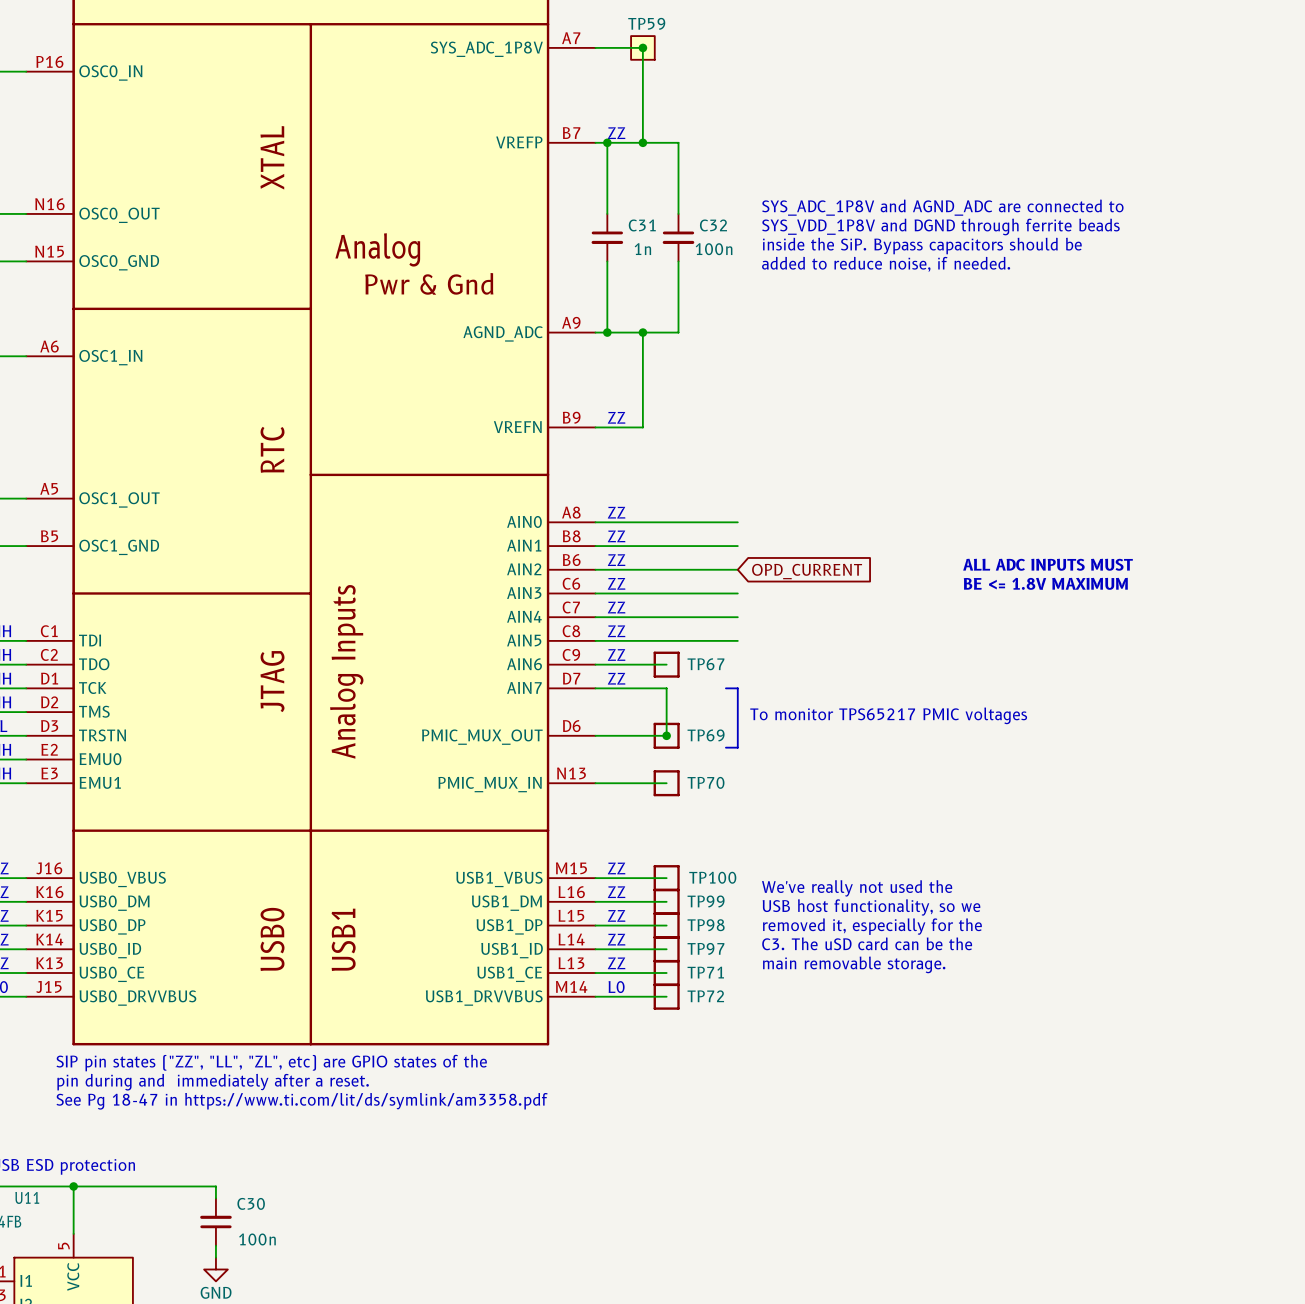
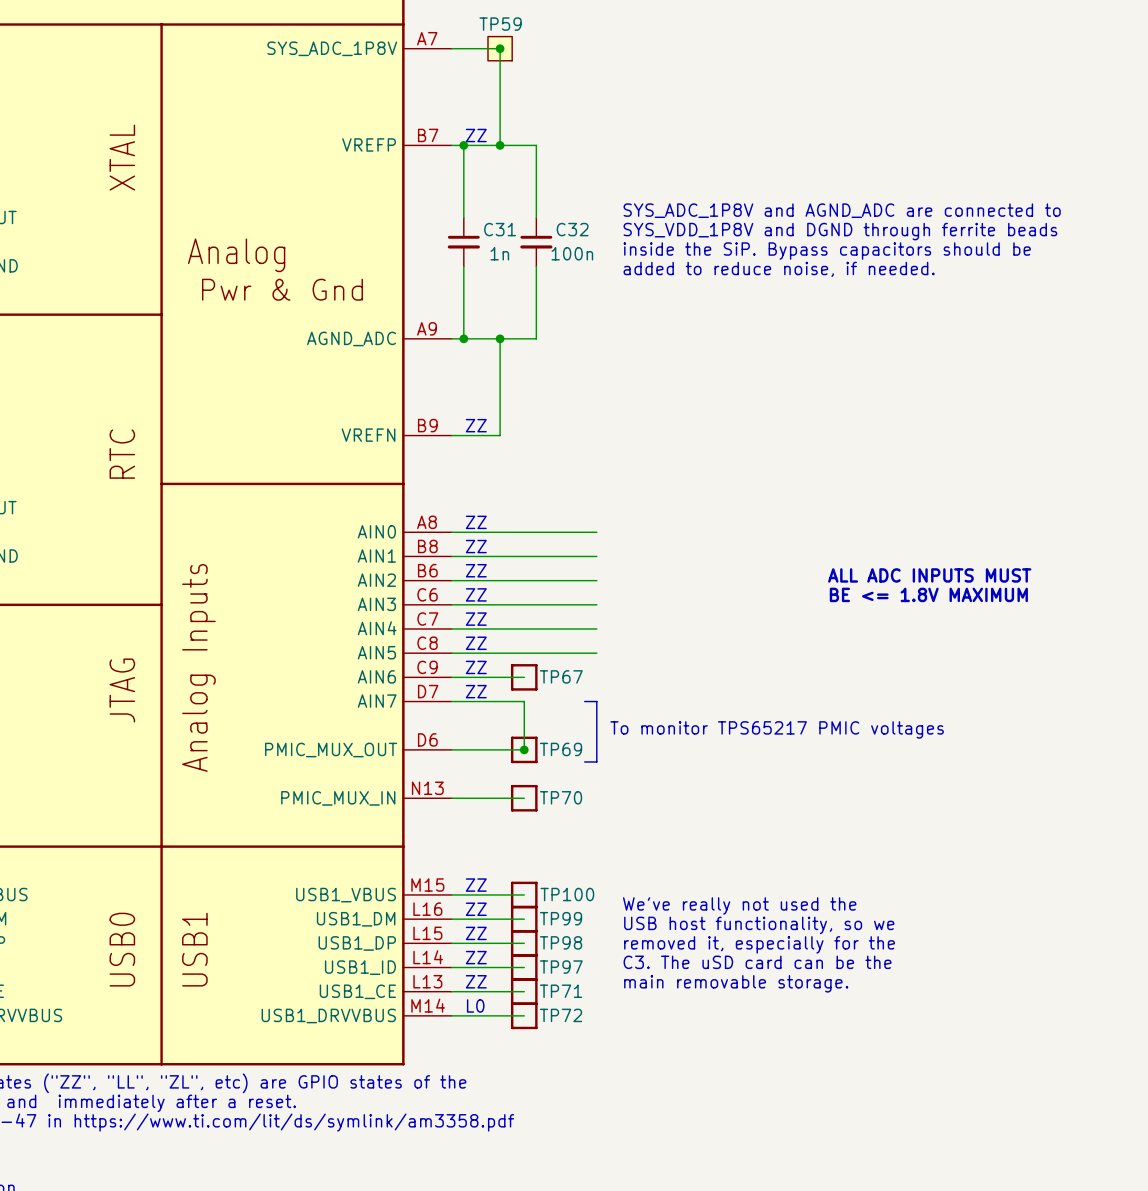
global label: OPD_CURRENT (807, 571) -> none

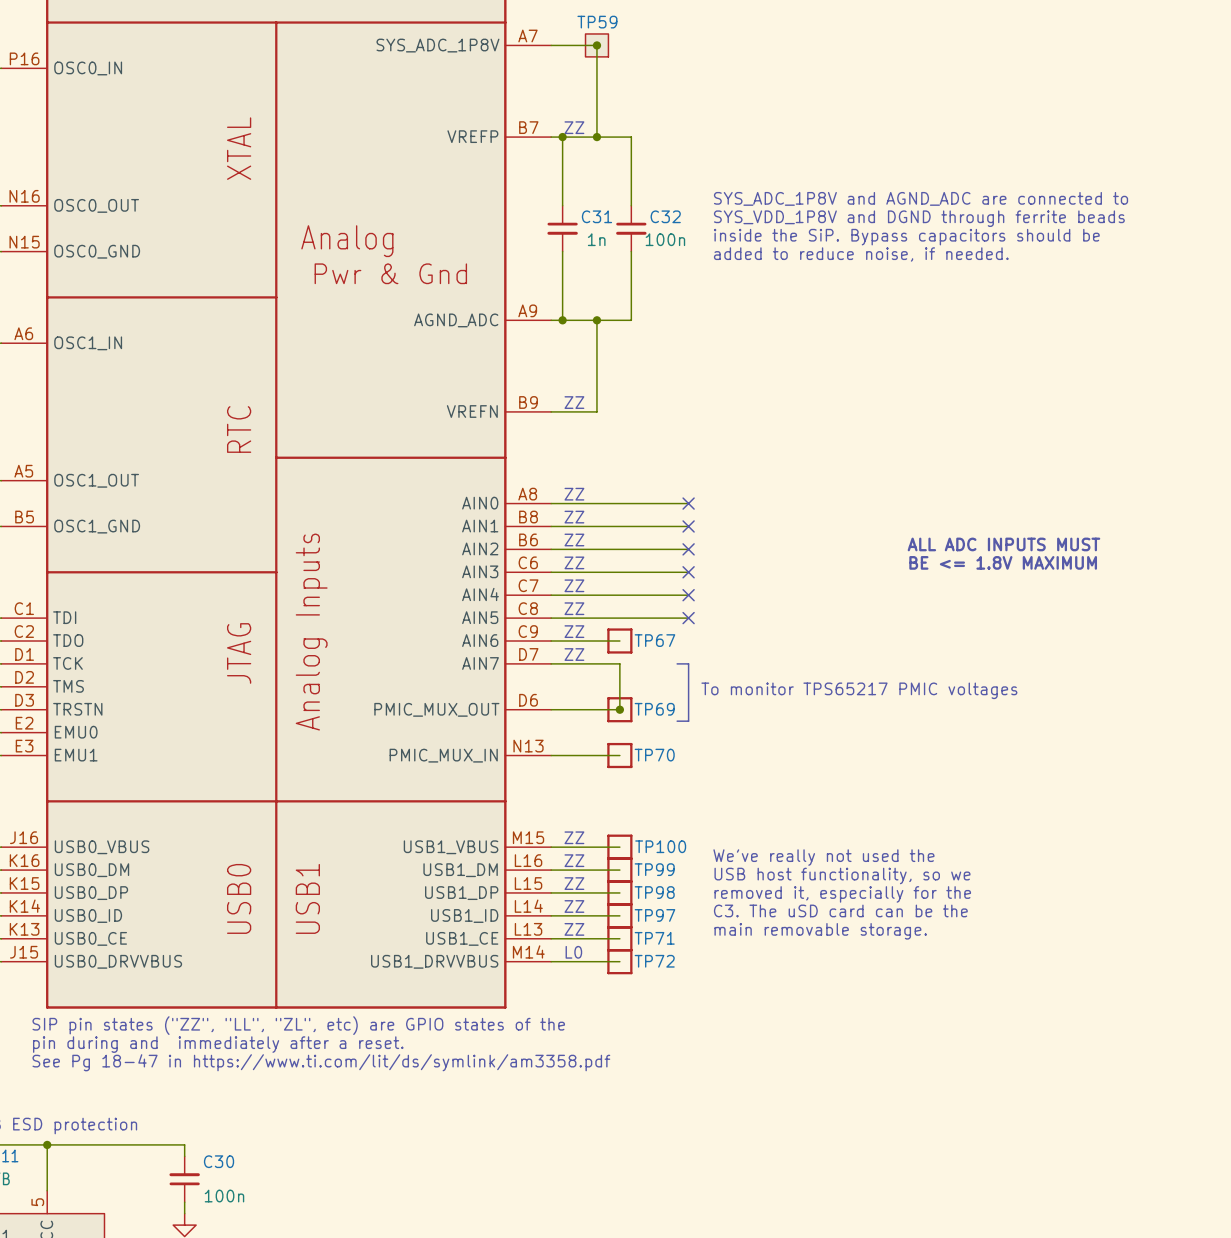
no-connect mark: none -> (688, 503)
no-connect mark: none -> (688, 526)
no-connect mark: none -> (688, 549)
no-connect mark: none -> (688, 572)
no-connect mark: none -> (688, 595)
no-connect mark: none -> (688, 618)

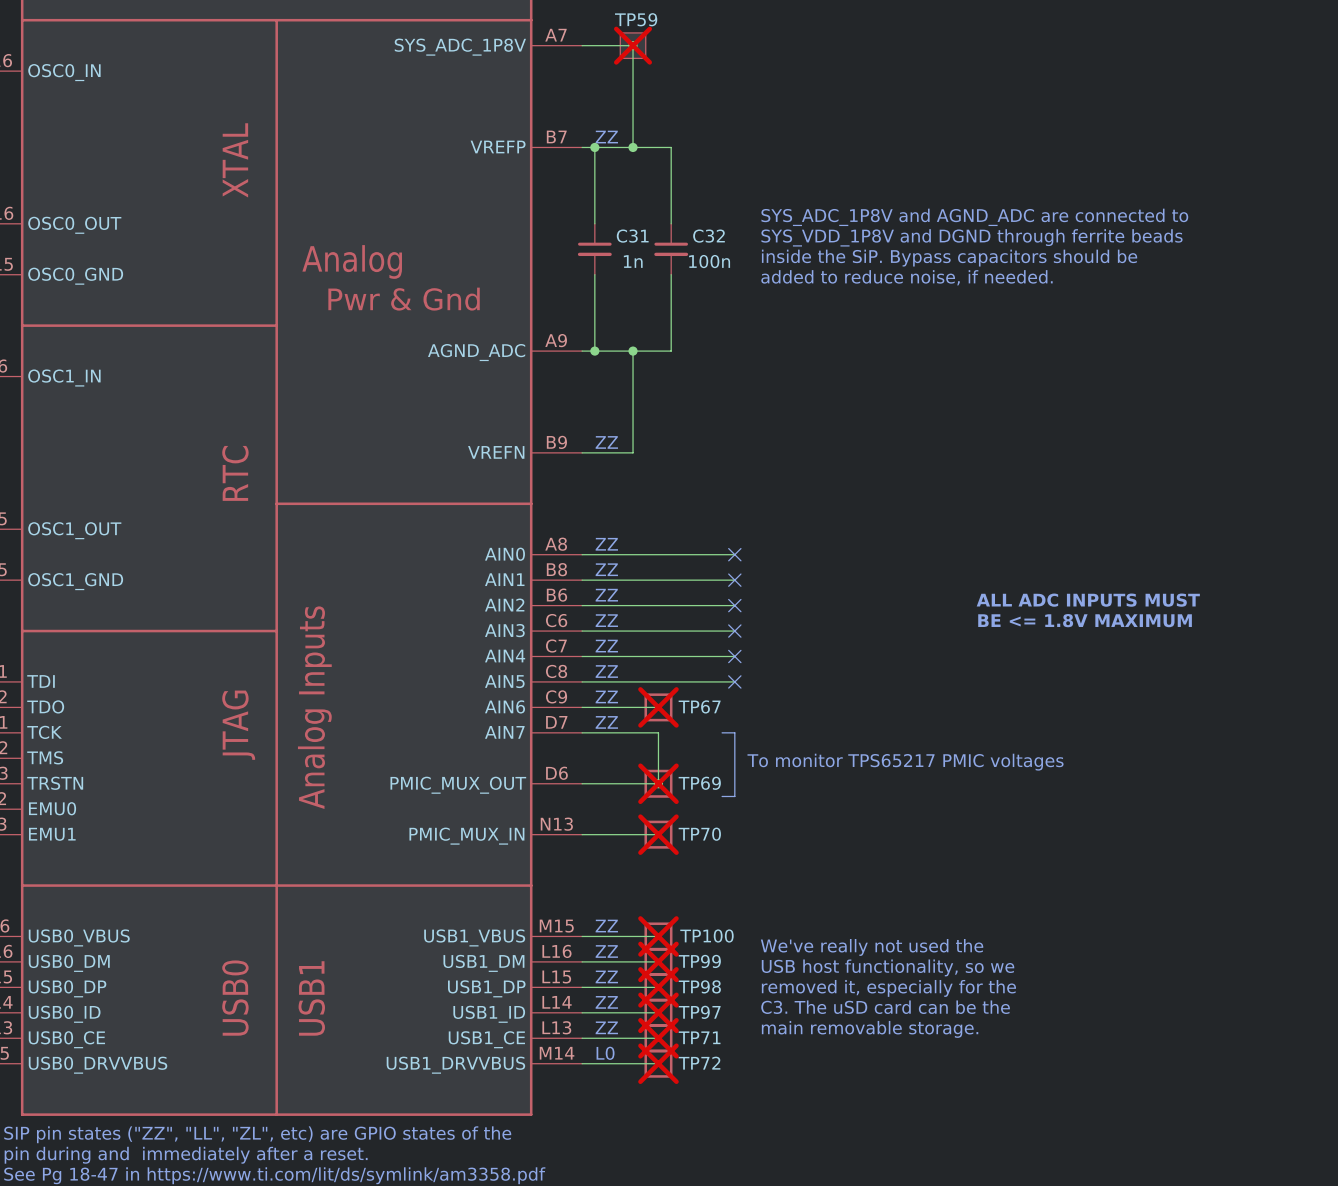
TP59 do-not-place cross: none -> (633, 45)
TP67 do-not-place cross: none -> (658, 707)
TP69 do-not-place cross: none -> (658, 783)
TP70 do-not-place cross: none -> (658, 834)
TP100 do-not-place cross: none -> (658, 936)
TP99 do-not-place cross: none -> (658, 961)
TP98 do-not-place cross: none -> (658, 987)
TP97 do-not-place cross: none -> (658, 1012)
TP71 do-not-place cross: none -> (658, 1038)
TP72 do-not-place cross: none -> (658, 1063)

